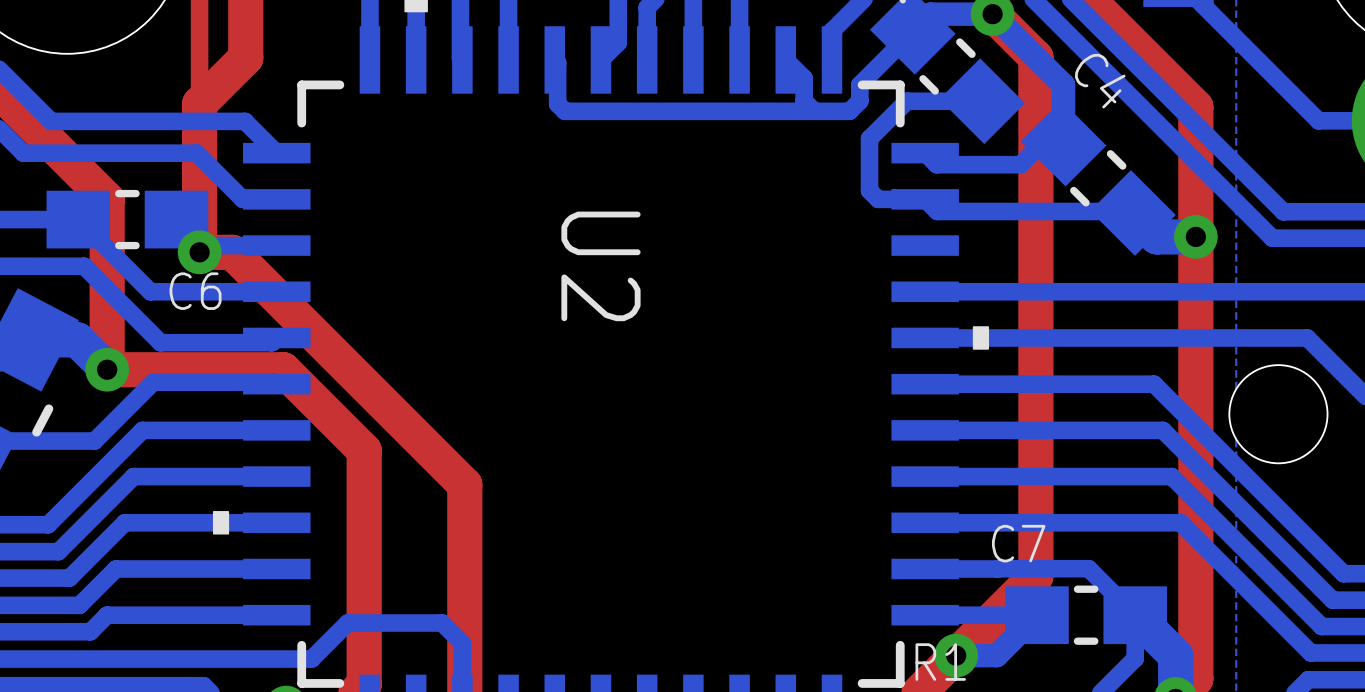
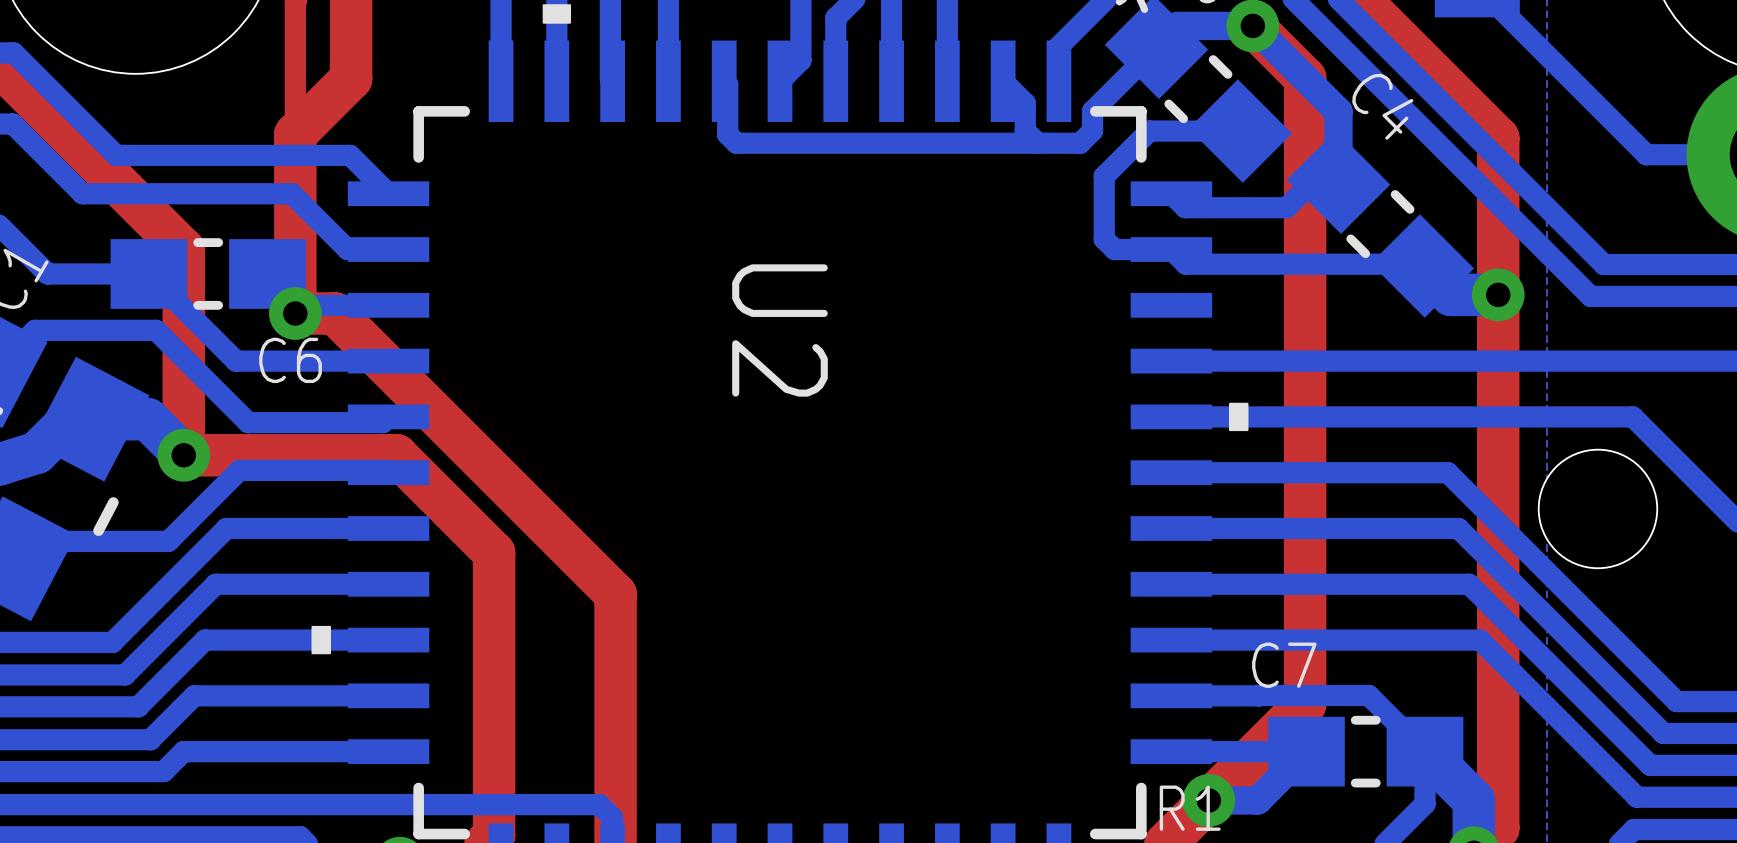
bottom track: (311, 659) (347, 623) (442, 623) (462, 643) (462, 670) -> (430, 804) (599, 804) (612, 817)

